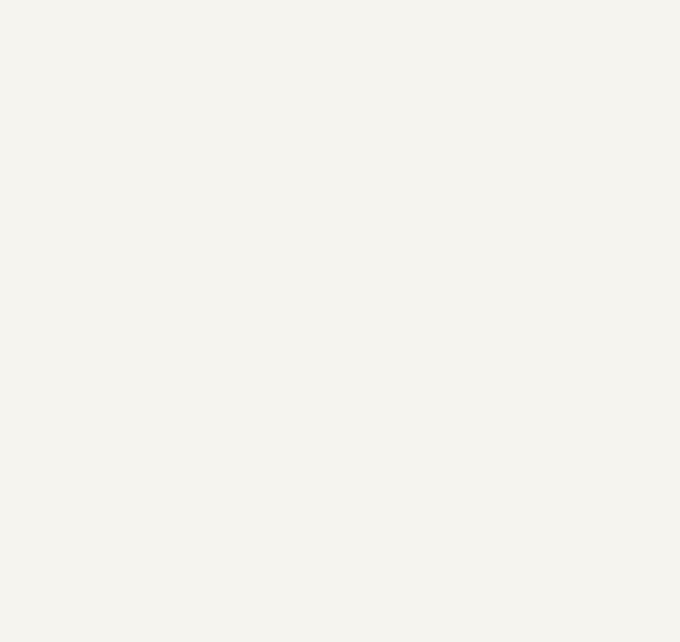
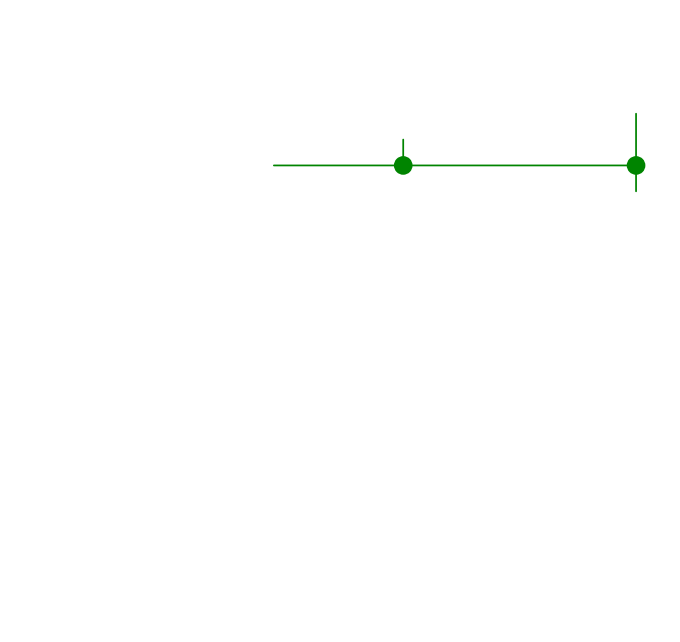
wire: none -> (636, 113) (636, 191)
wire: none -> (403, 139) (403, 165)
wire: none -> (273, 165) (636, 165)
junction: none -> (403, 165)
junction: none -> (636, 165)

